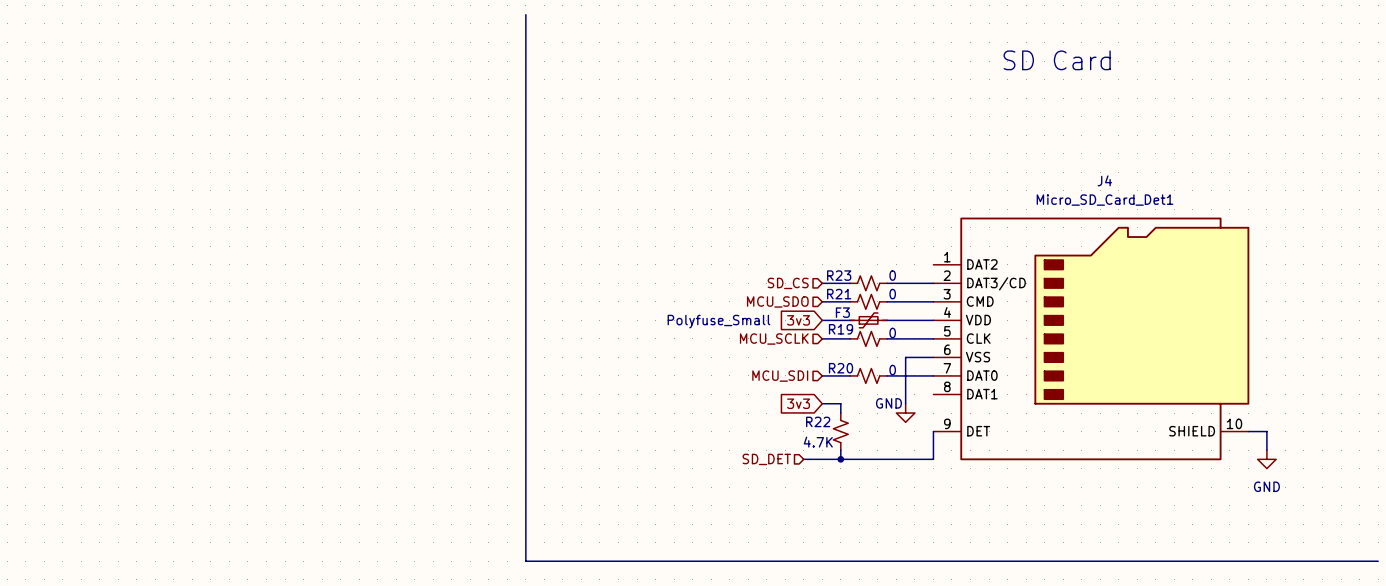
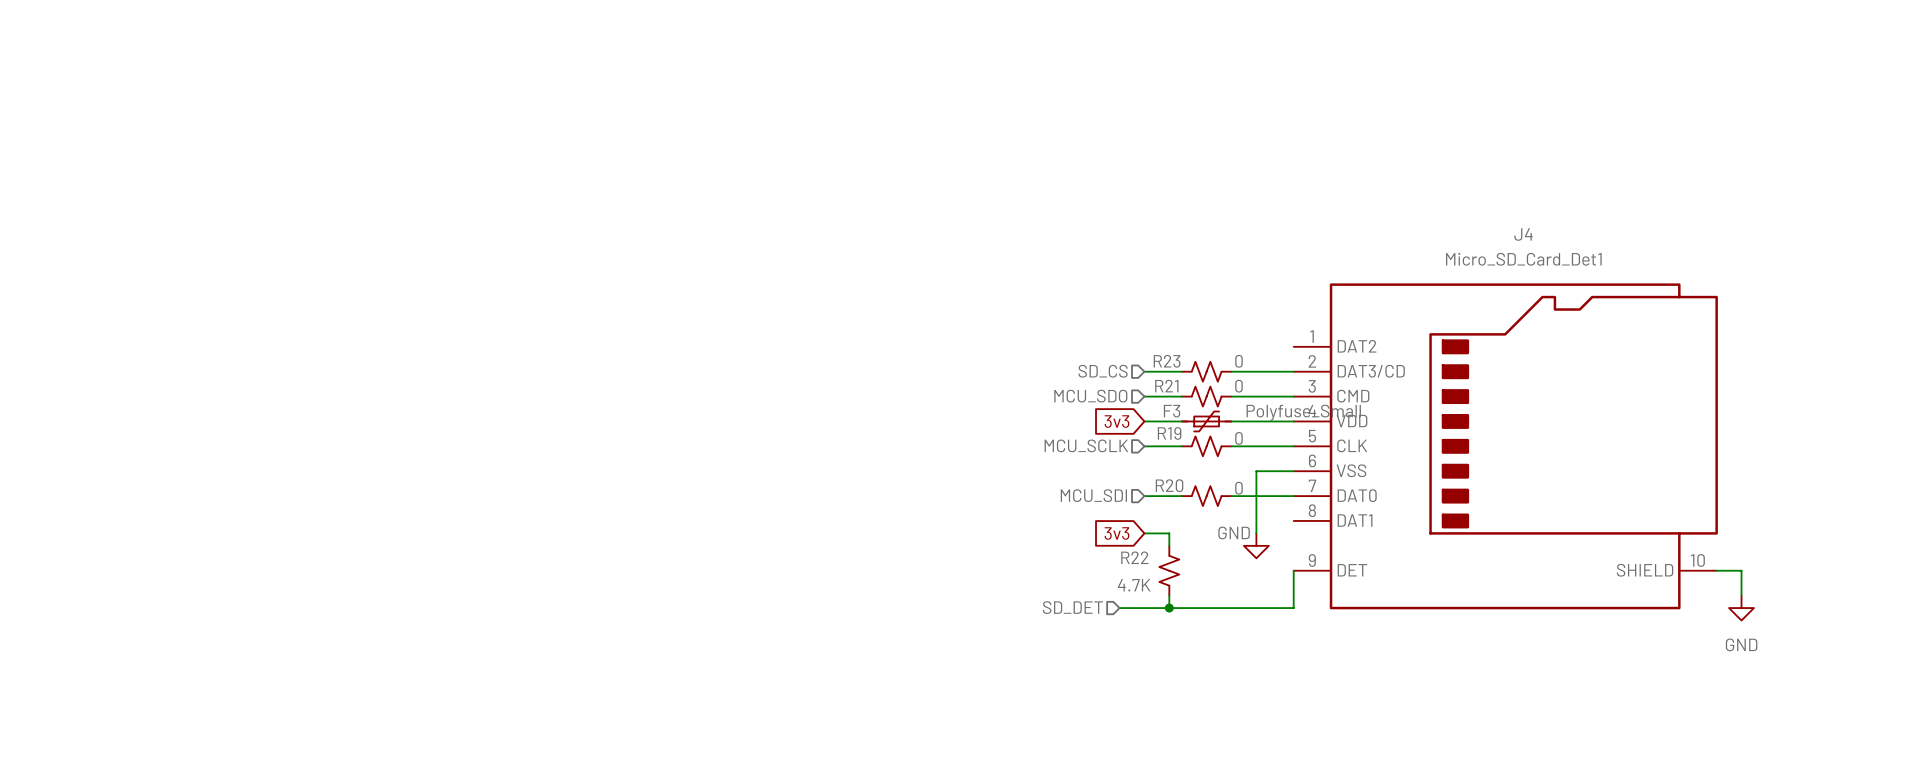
line: (525, 14) (525, 561) (1378, 561) -> none
text: SD Card (1057, 60) -> none
F3 value position: Polyfuse_Small (718, 321) -> Polyfuse_Small (1303, 412)

